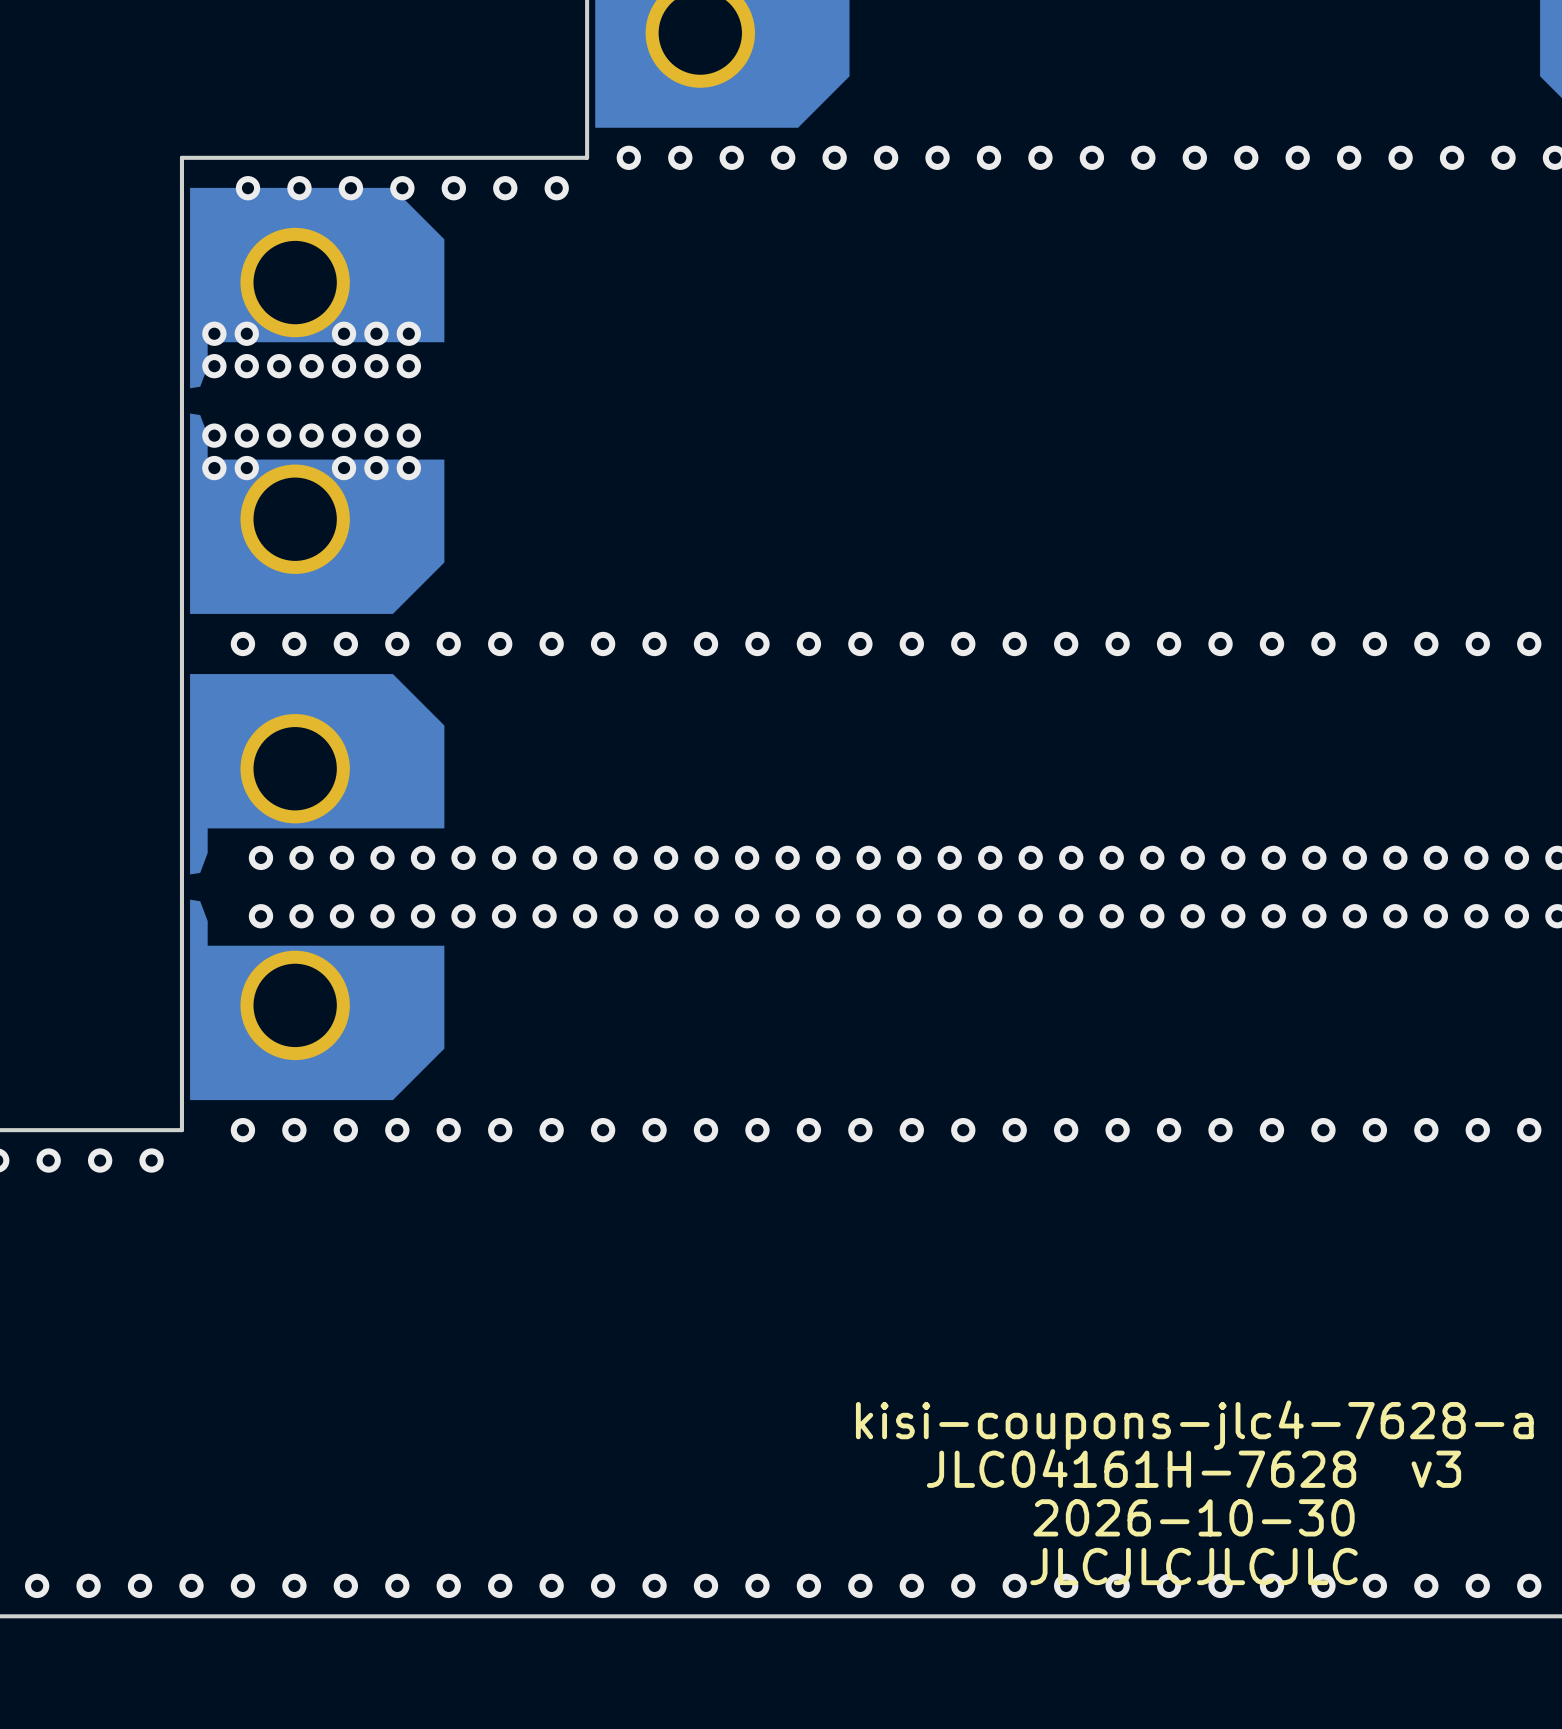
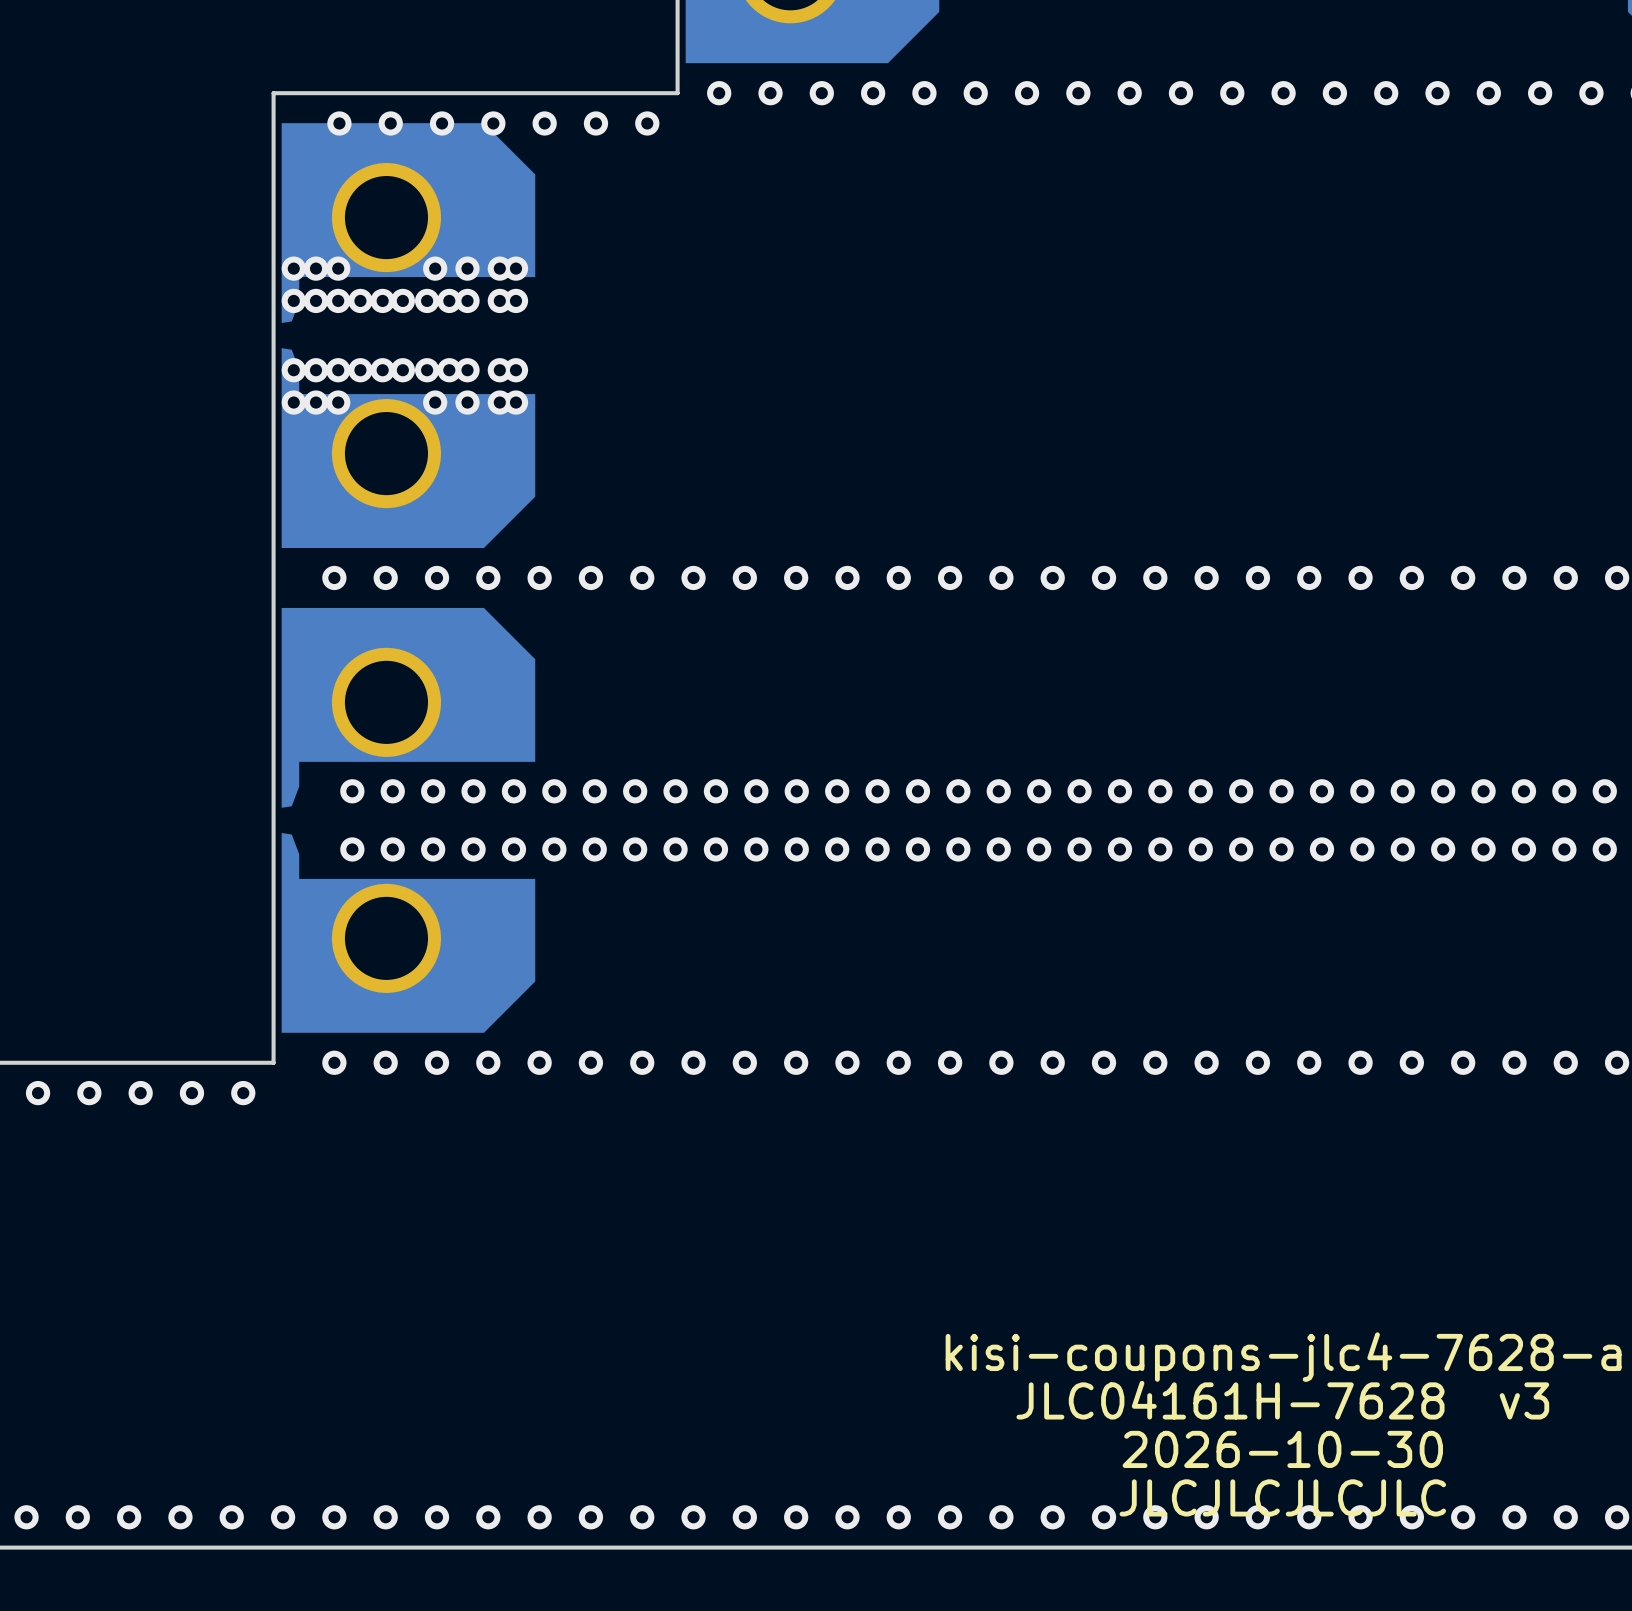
via: none -> (293, 268)
via: (214, 333) -> none
via: none -> (316, 268)
via: none -> (515, 268)
via: none -> (293, 300)
via: (214, 366) -> none
via: none -> (316, 300)
via: none -> (360, 300)
via: (279, 366) -> none
via: none -> (382, 300)
via: none -> (427, 300)
via: (344, 366) -> none
via: none -> (449, 300)
via: none -> (515, 300)
via: none -> (293, 370)
via: (214, 435) -> none
via: none -> (316, 370)
via: none -> (360, 370)
via: (279, 435) -> none
via: none -> (382, 370)
via: none -> (427, 370)
via: (344, 435) -> none
via: none -> (449, 370)
via: none -> (515, 370)
via: none -> (293, 402)
via: (214, 468) -> none
via: none -> (316, 402)
via: none -> (515, 402)

